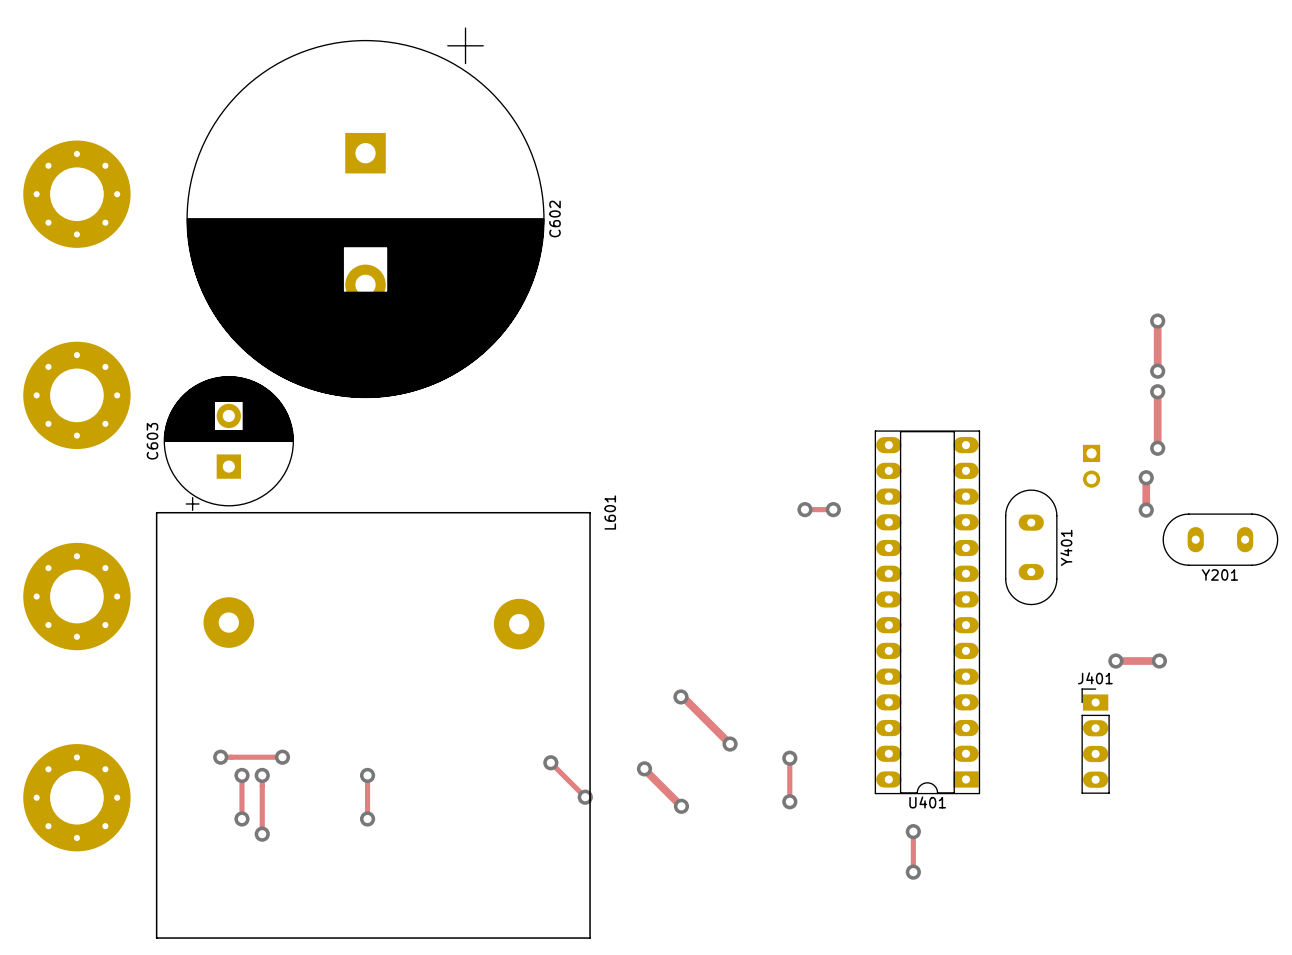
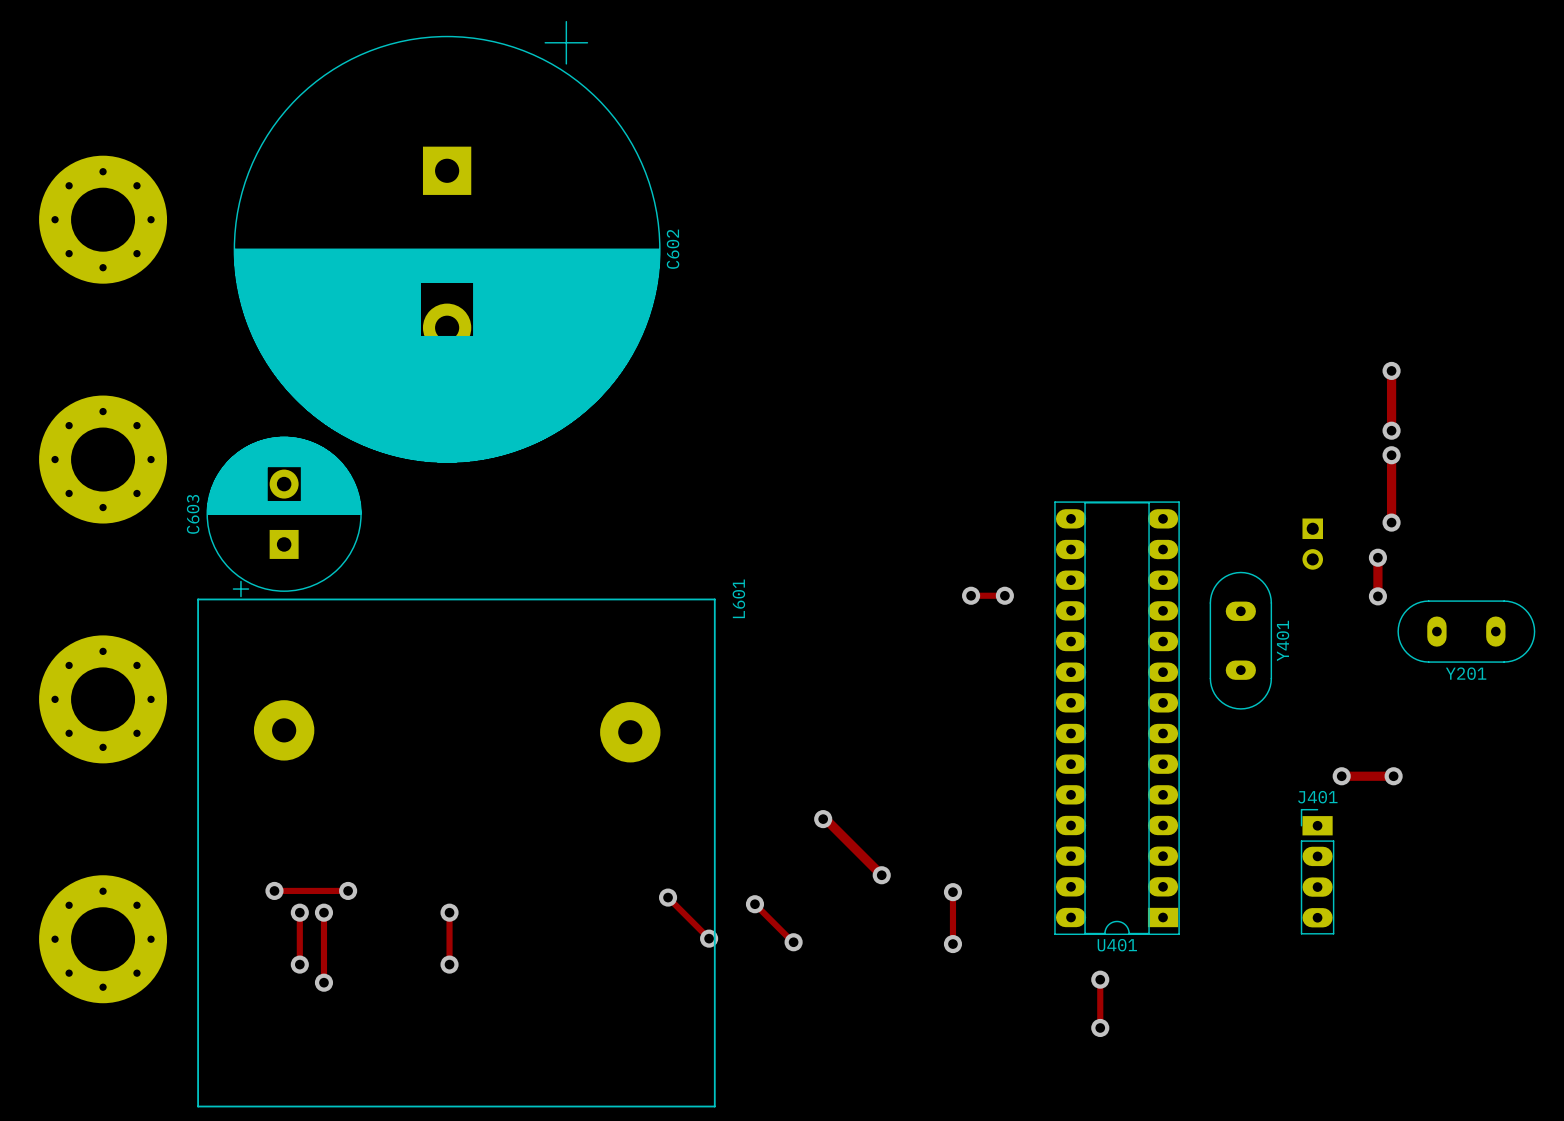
track: none -> (754, 904) (793, 942)
via: none -> (754, 904)
track: (644, 768) (681, 806) -> none
via: (644, 768) -> none
via: none -> (793, 942)
via: (681, 806) -> none

